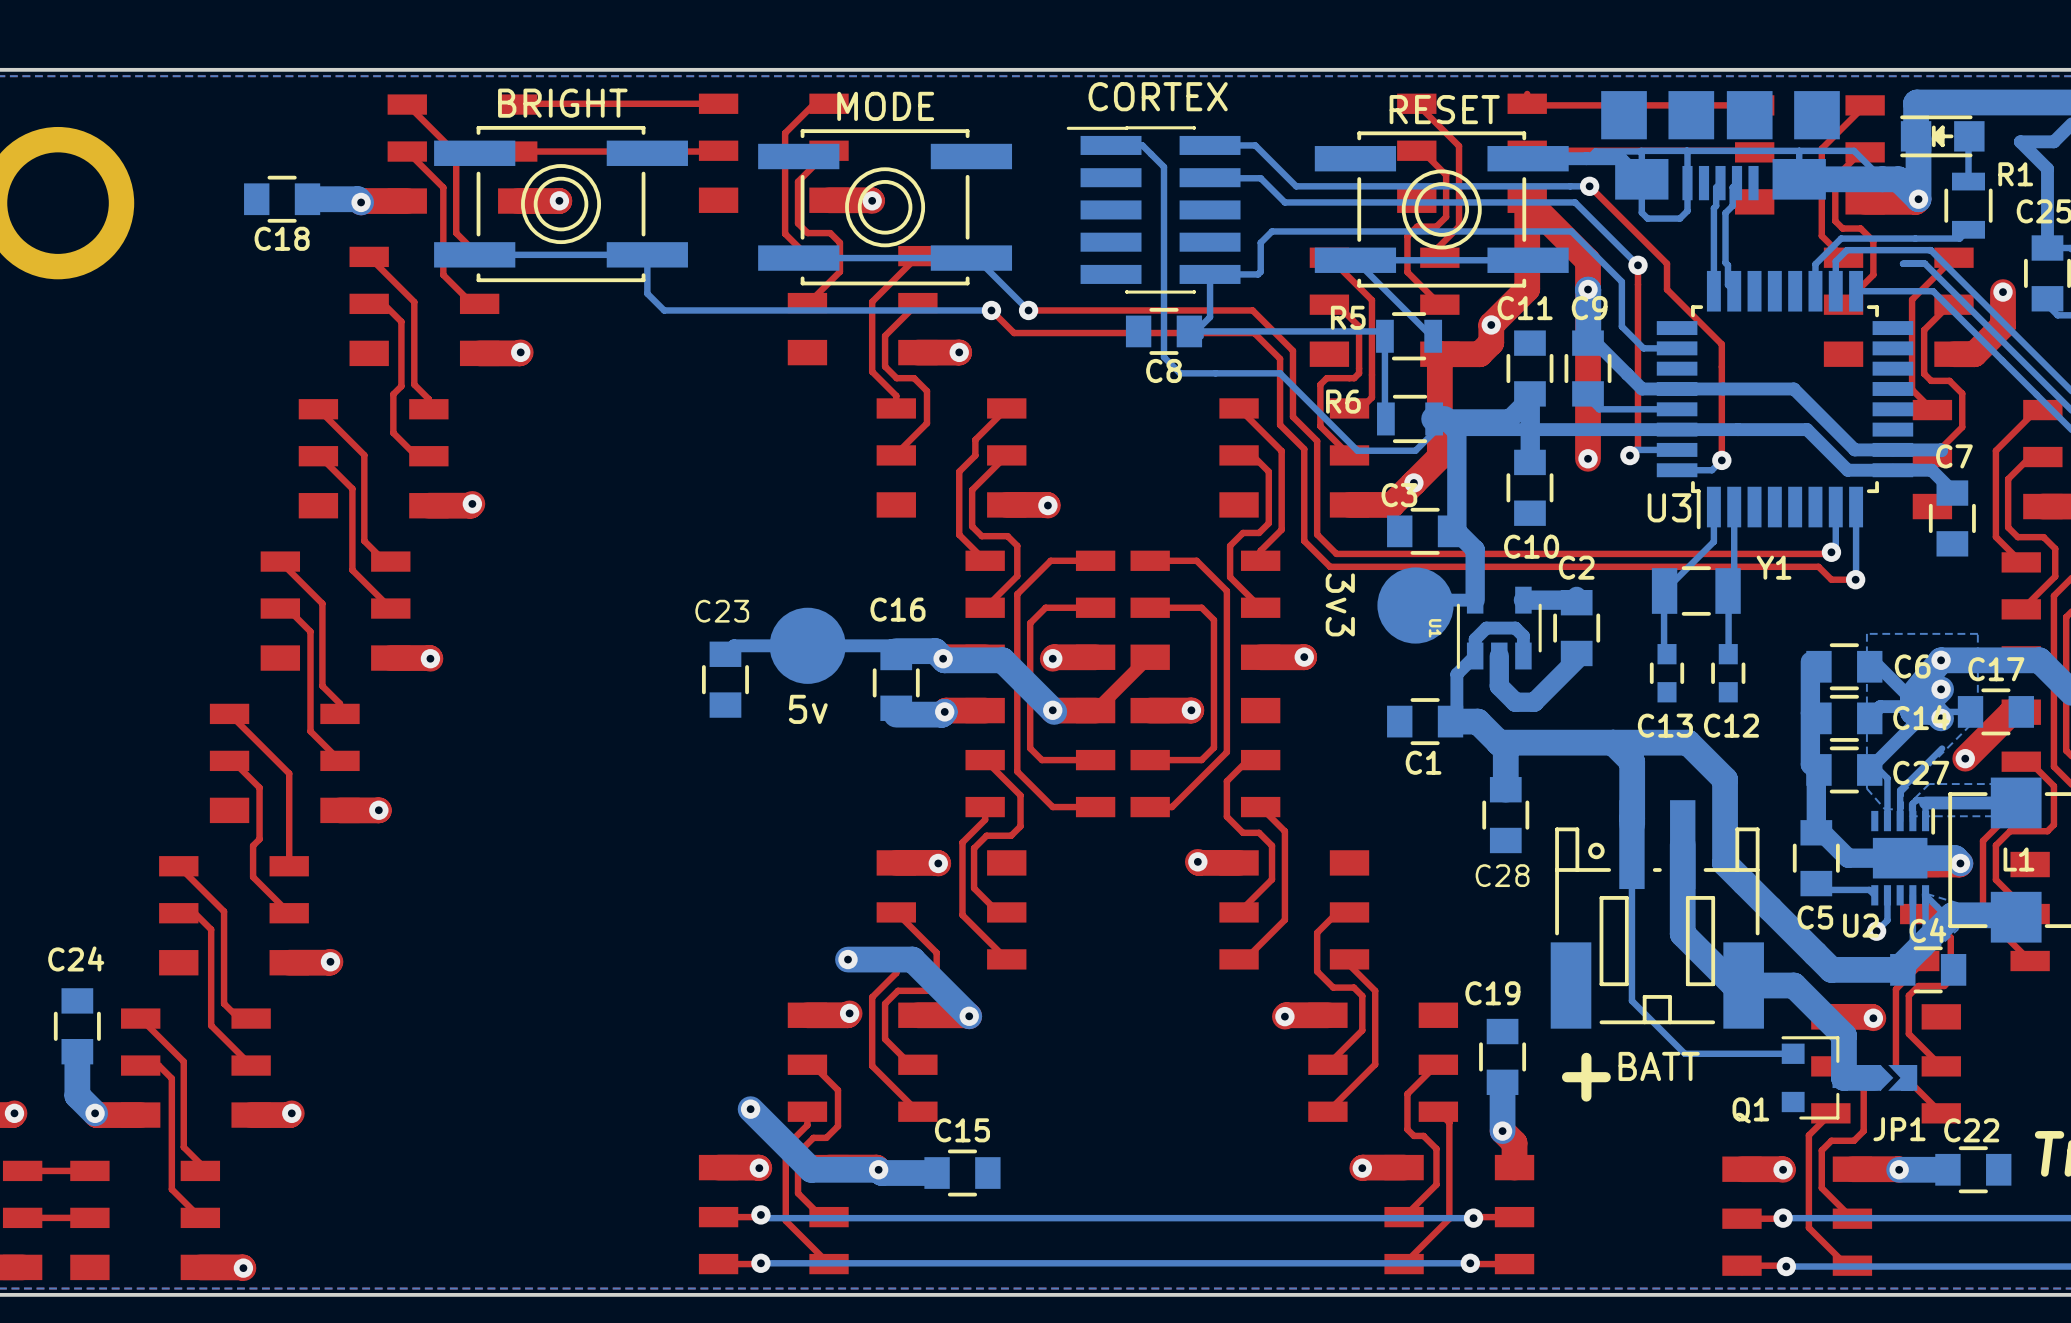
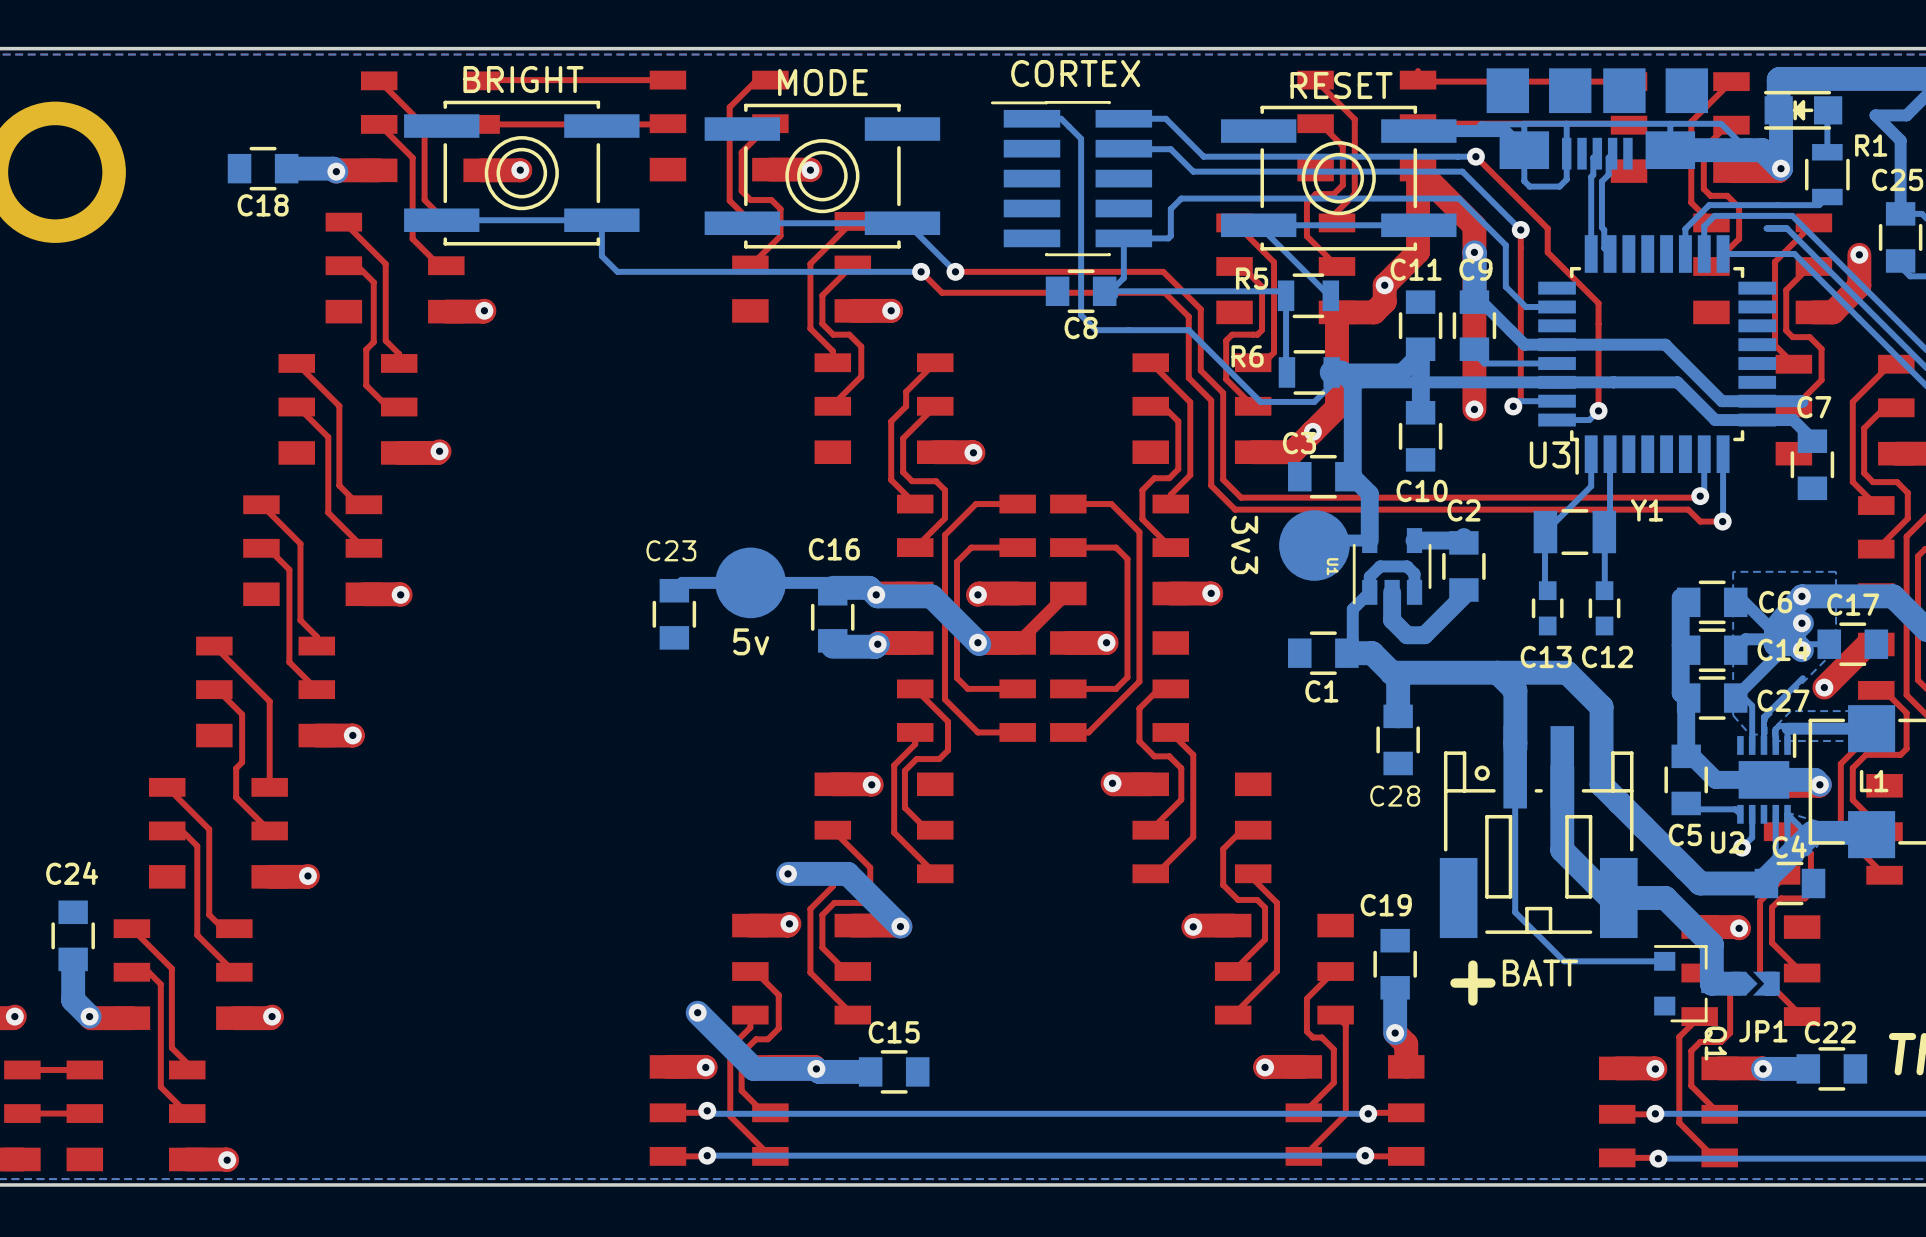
Q1 name rotation: 0° (1750, 1110) -> 90° clockwise (1715, 1043)
Q1 name position: Q1 (1750, 1110) -> Q1 (1715, 1043)

